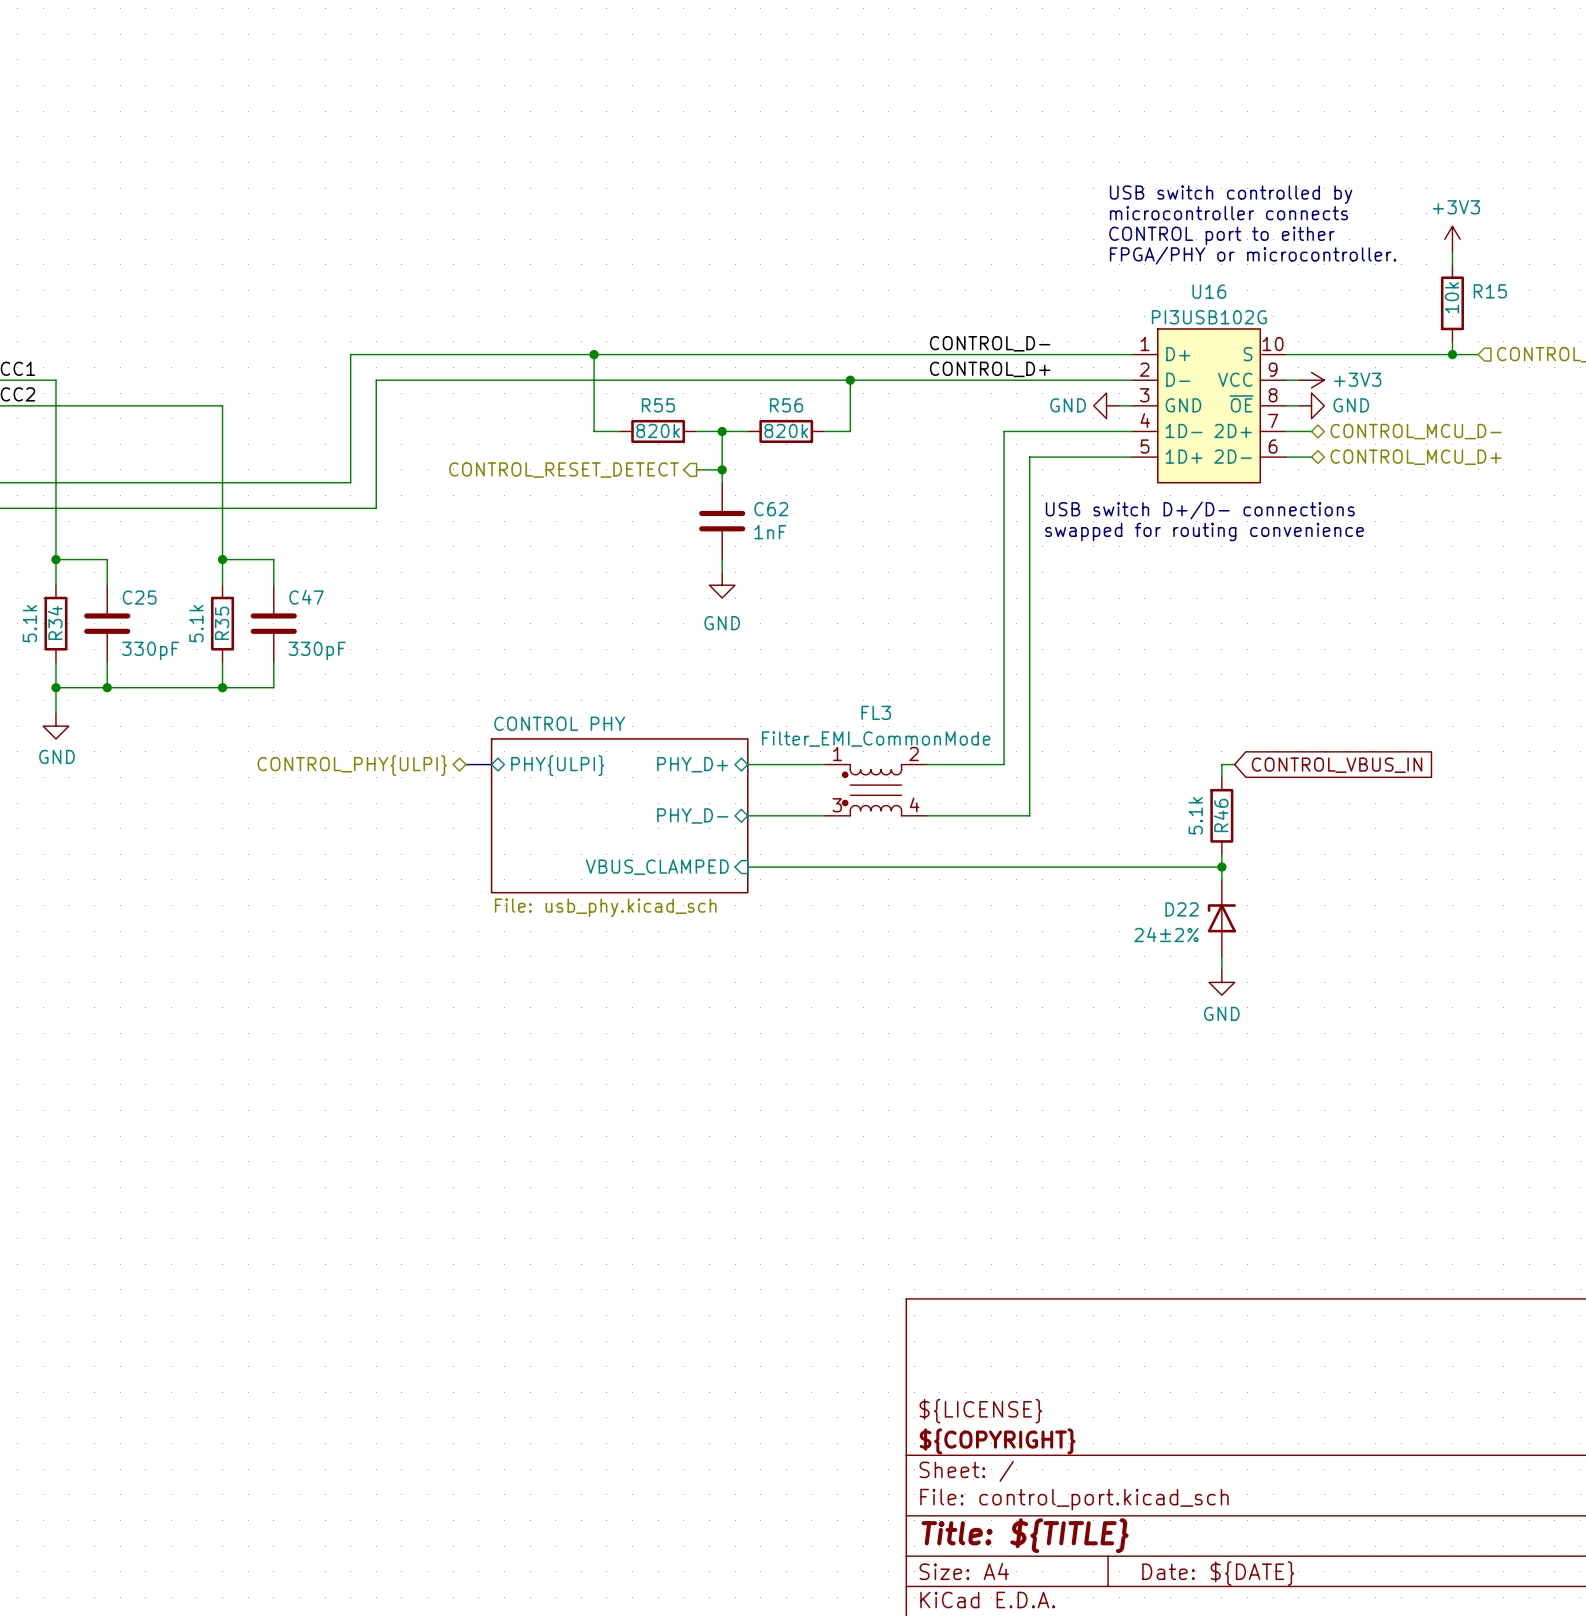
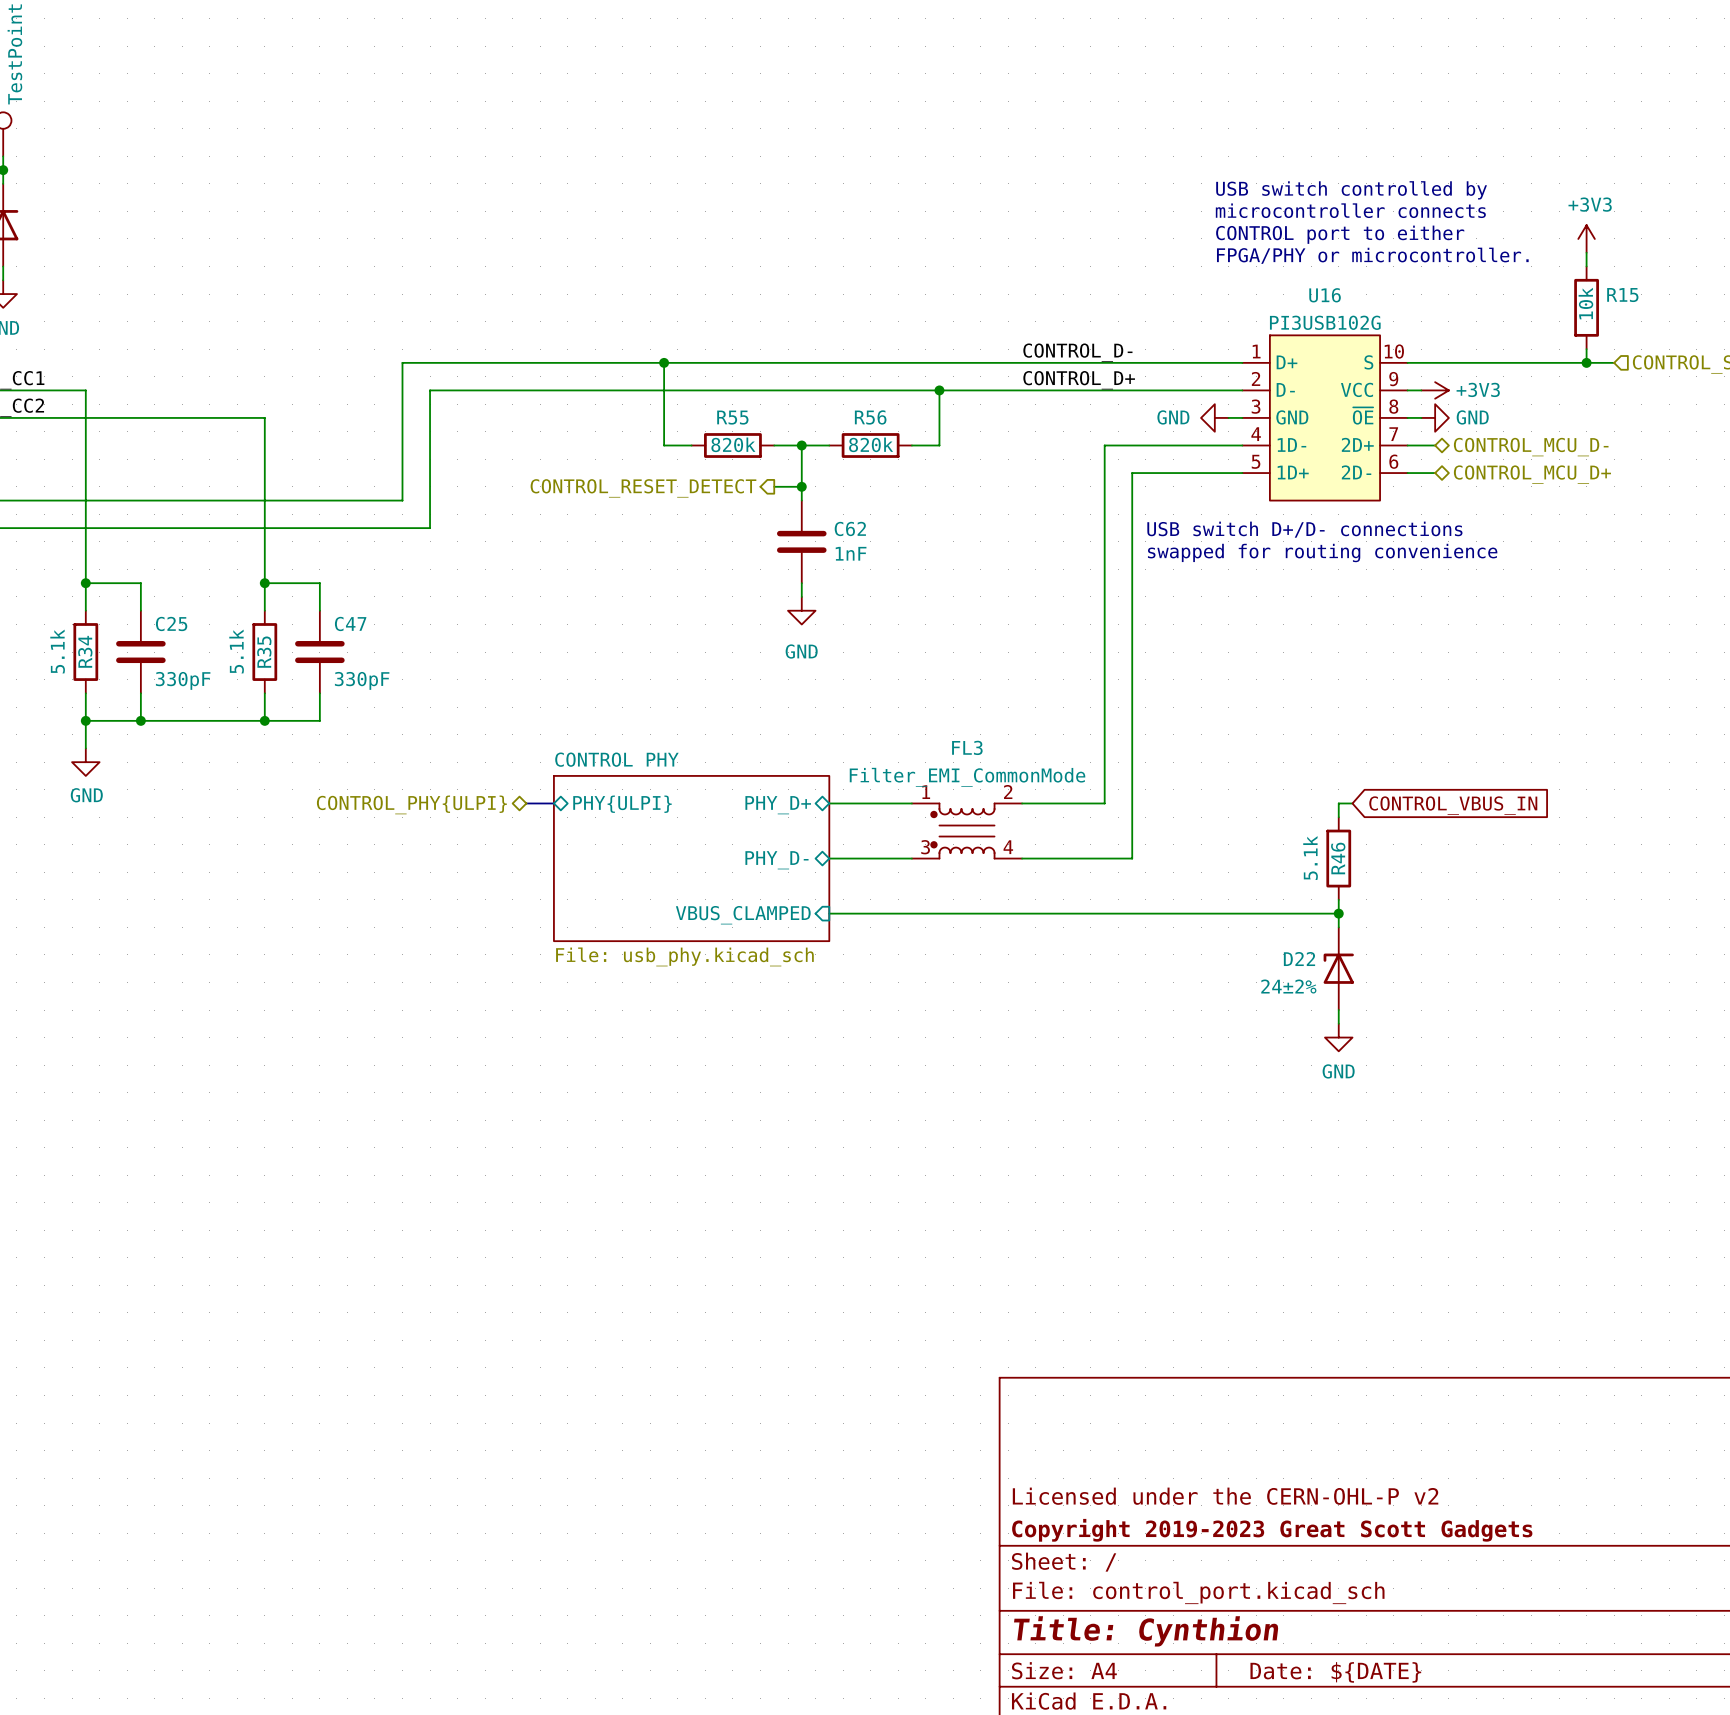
title block: ${LICENSE} (980, 1411) -> Licensed under the CERN-OHL-P v2 (1225, 1496)
title block: ${COPYRIGHT} (997, 1441) -> Copyright 2019-2023 Great Scott Gadgets (1272, 1530)
title block: Title: ${TITLE} (1025, 1535) -> Title: Cynthion (1146, 1631)

